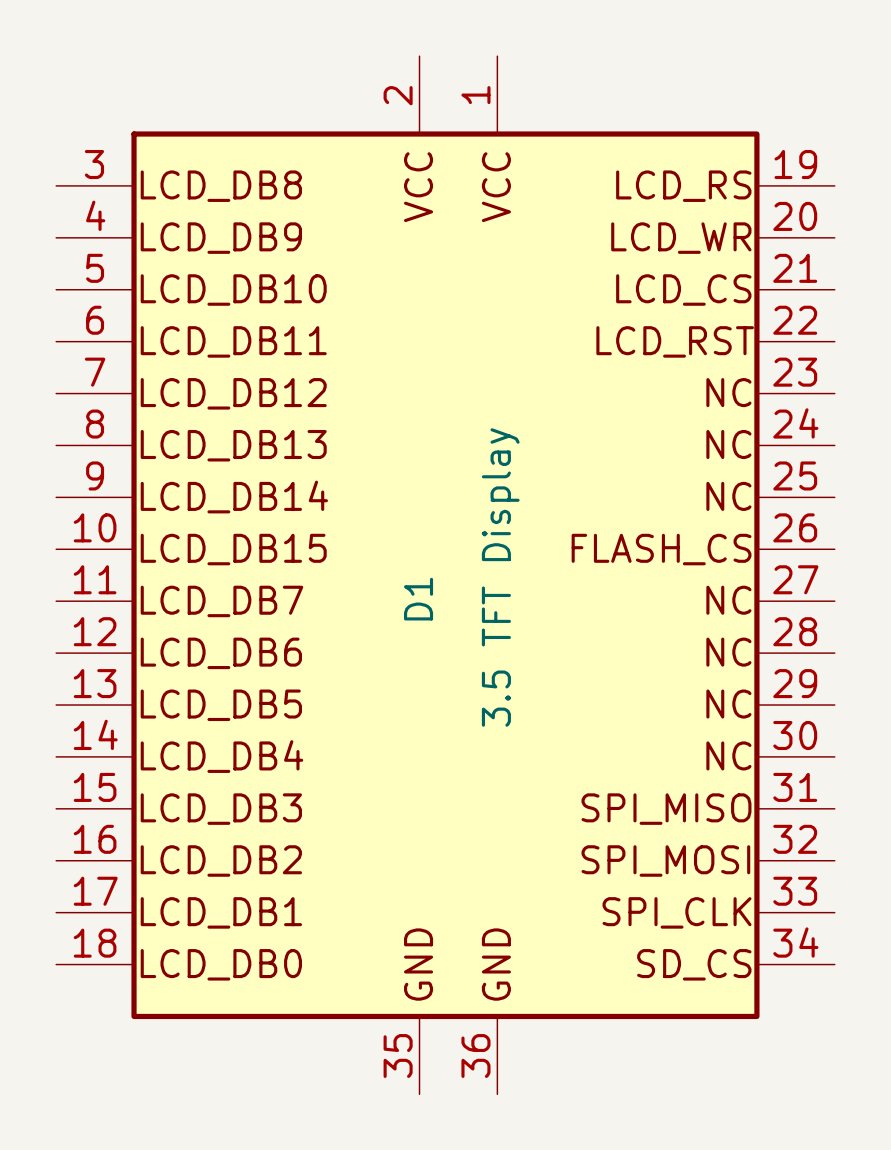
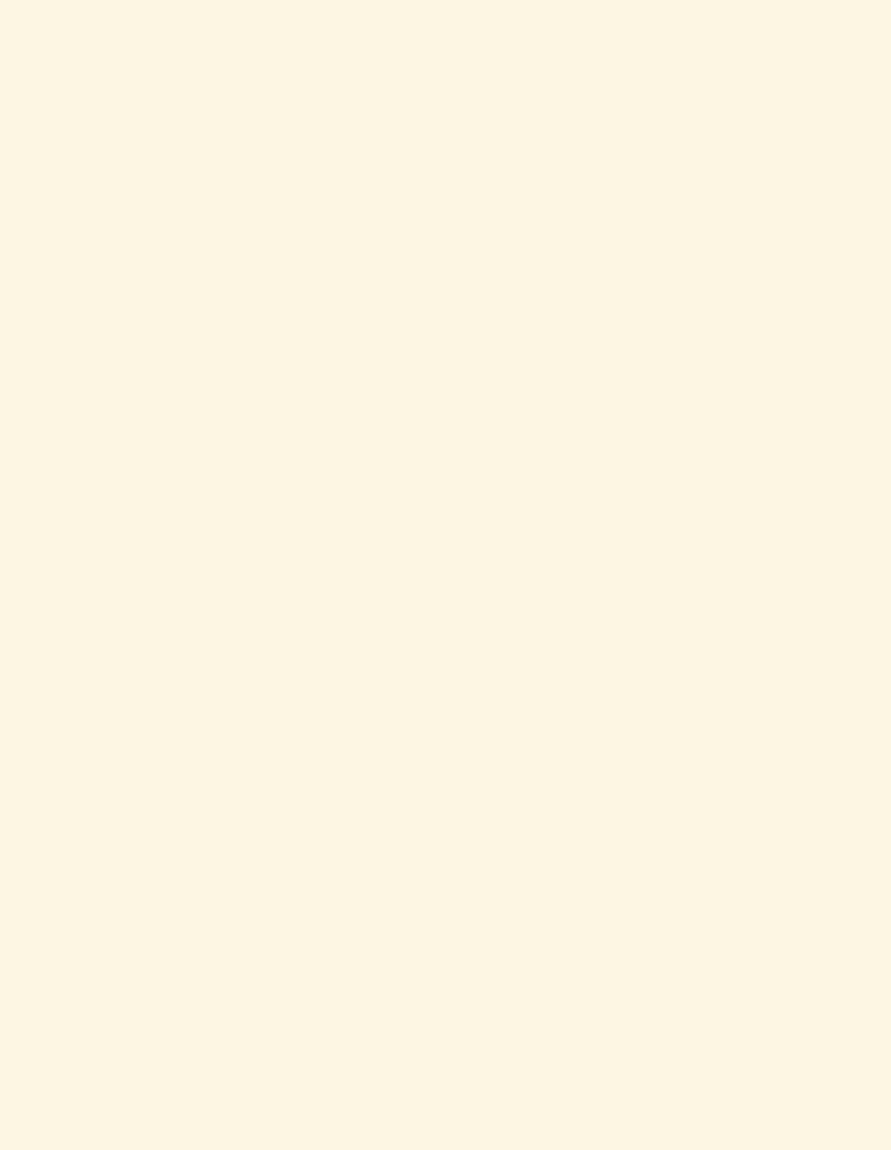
D1: 3.5 TFT Display (445, 575) -> none

